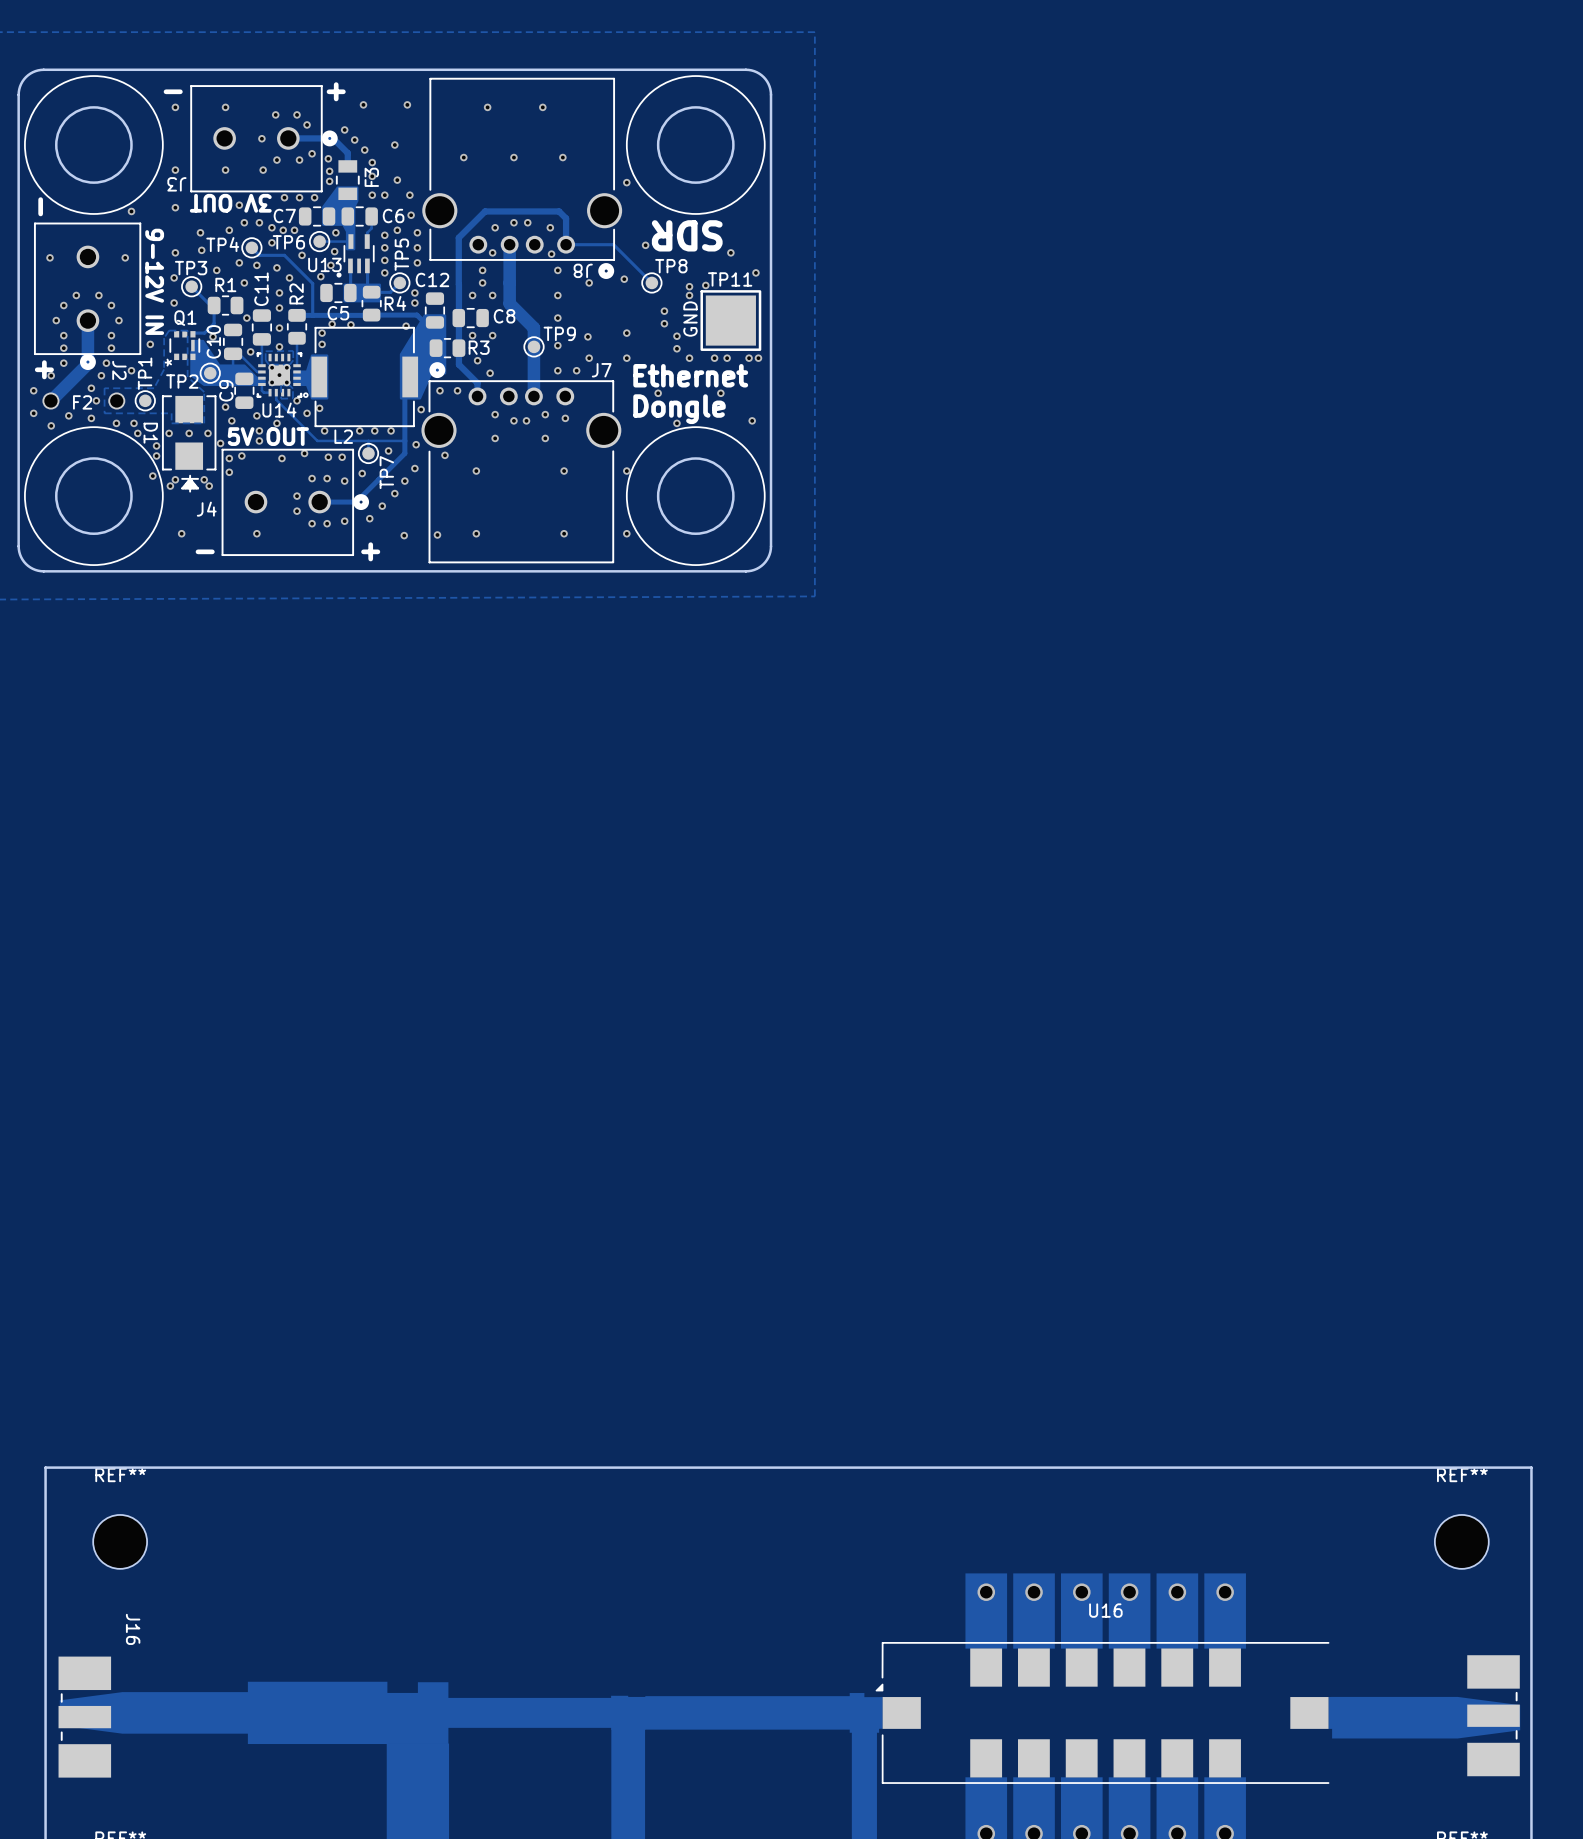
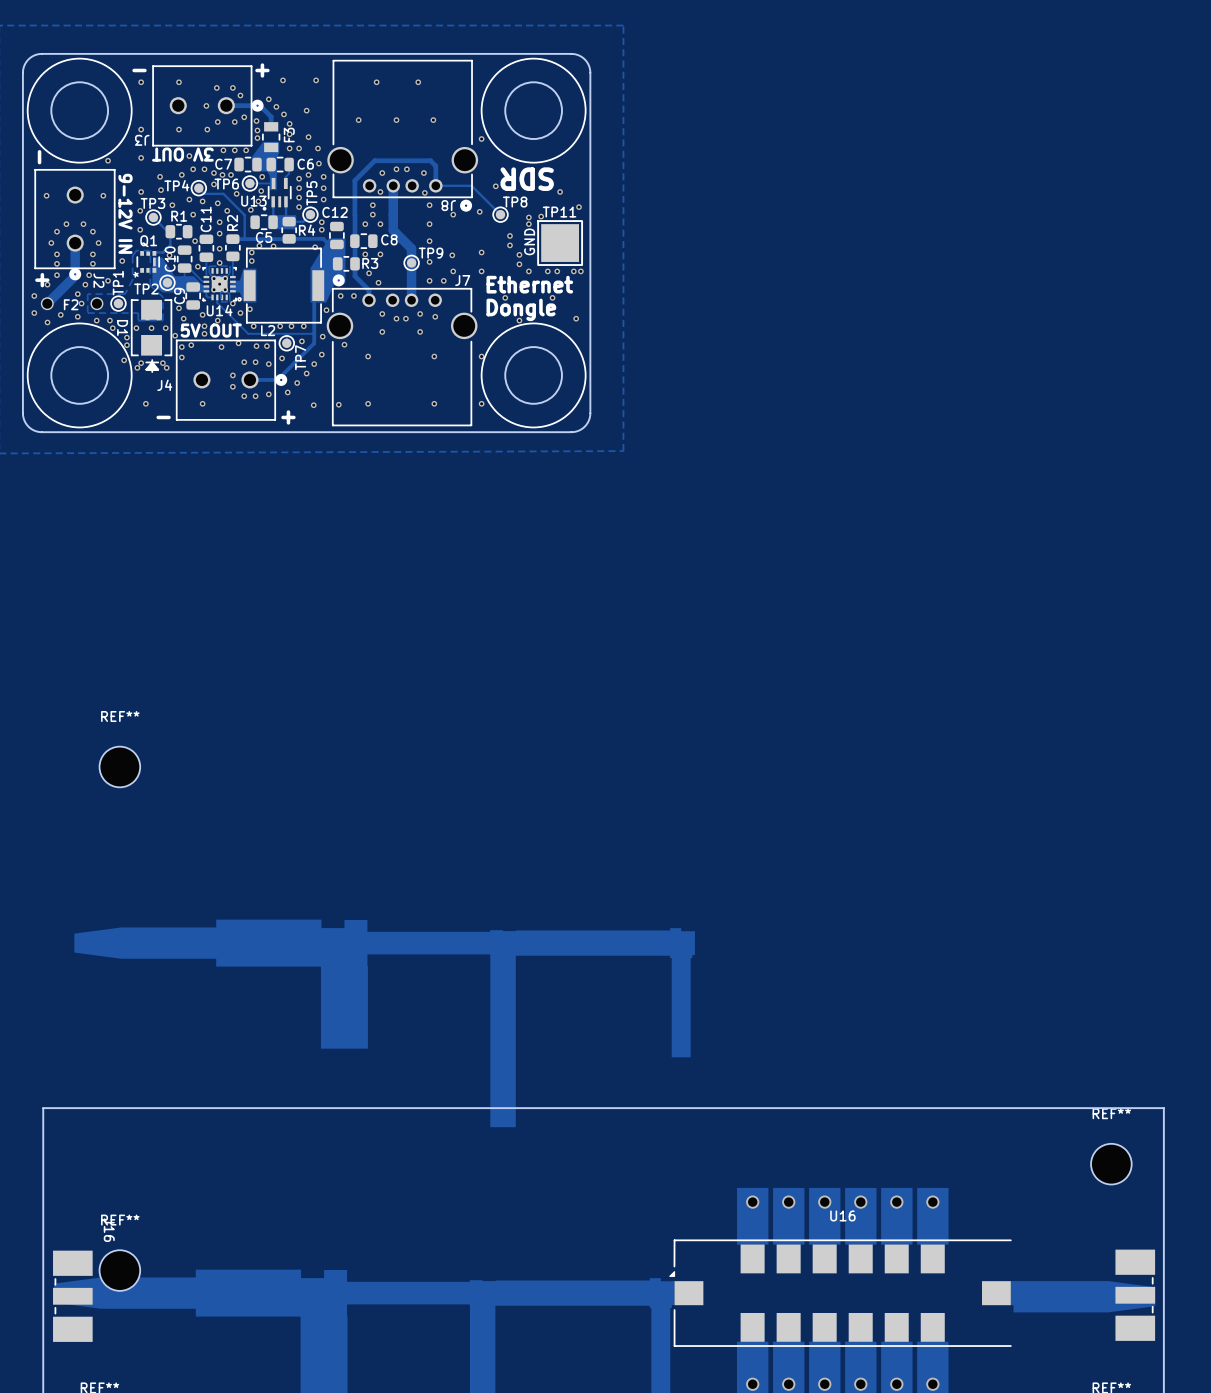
REF**: none -> (119, 766)
drawing: none -> [74, 919, 695, 1128]
REF** position: (120, 1541) -> (119, 1270)

